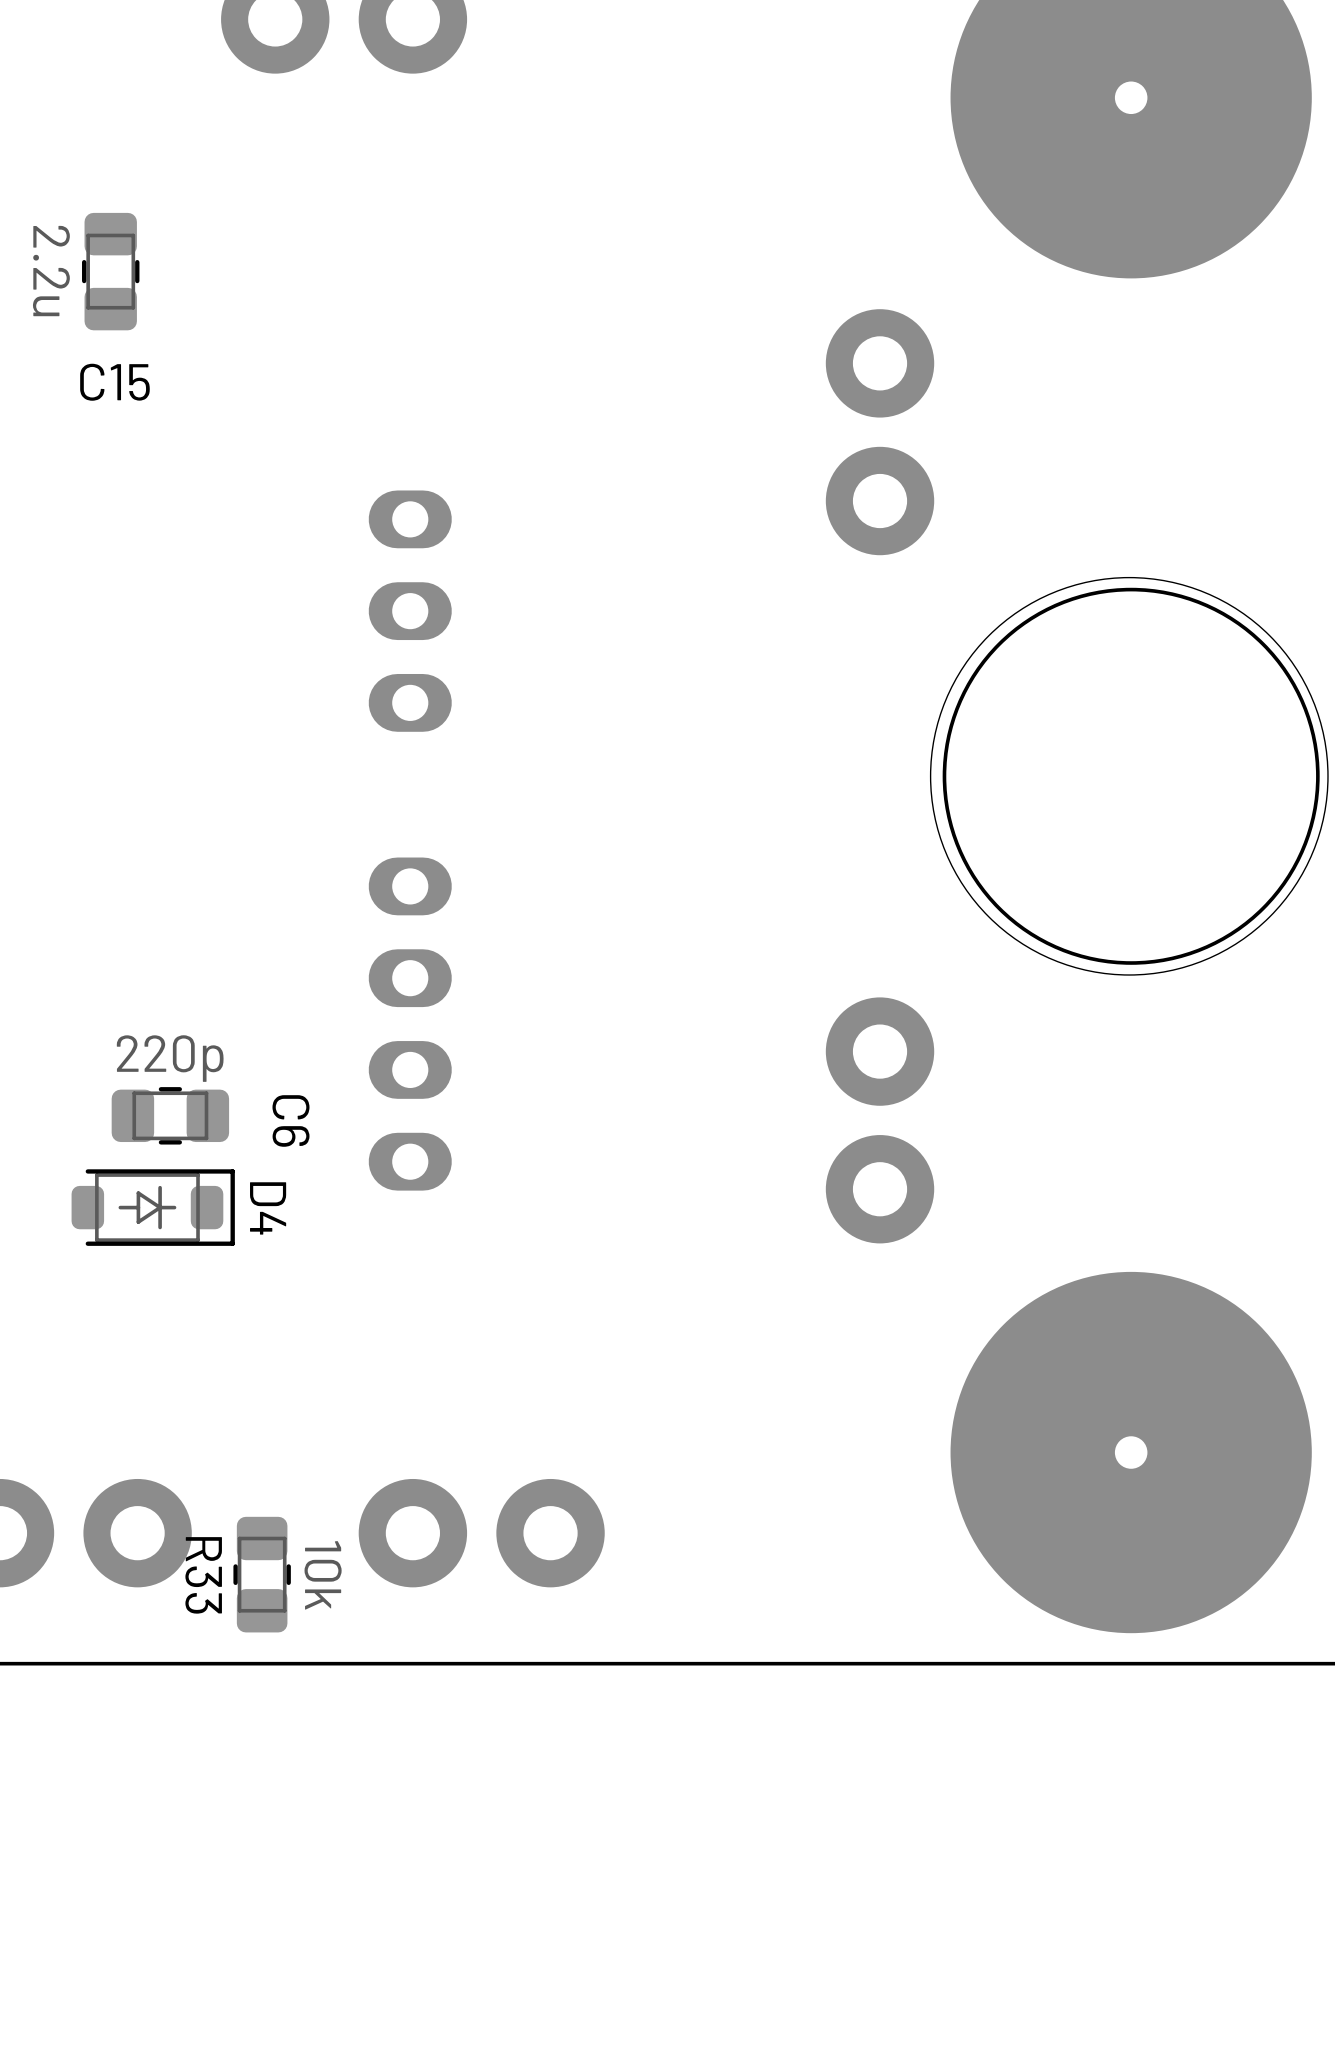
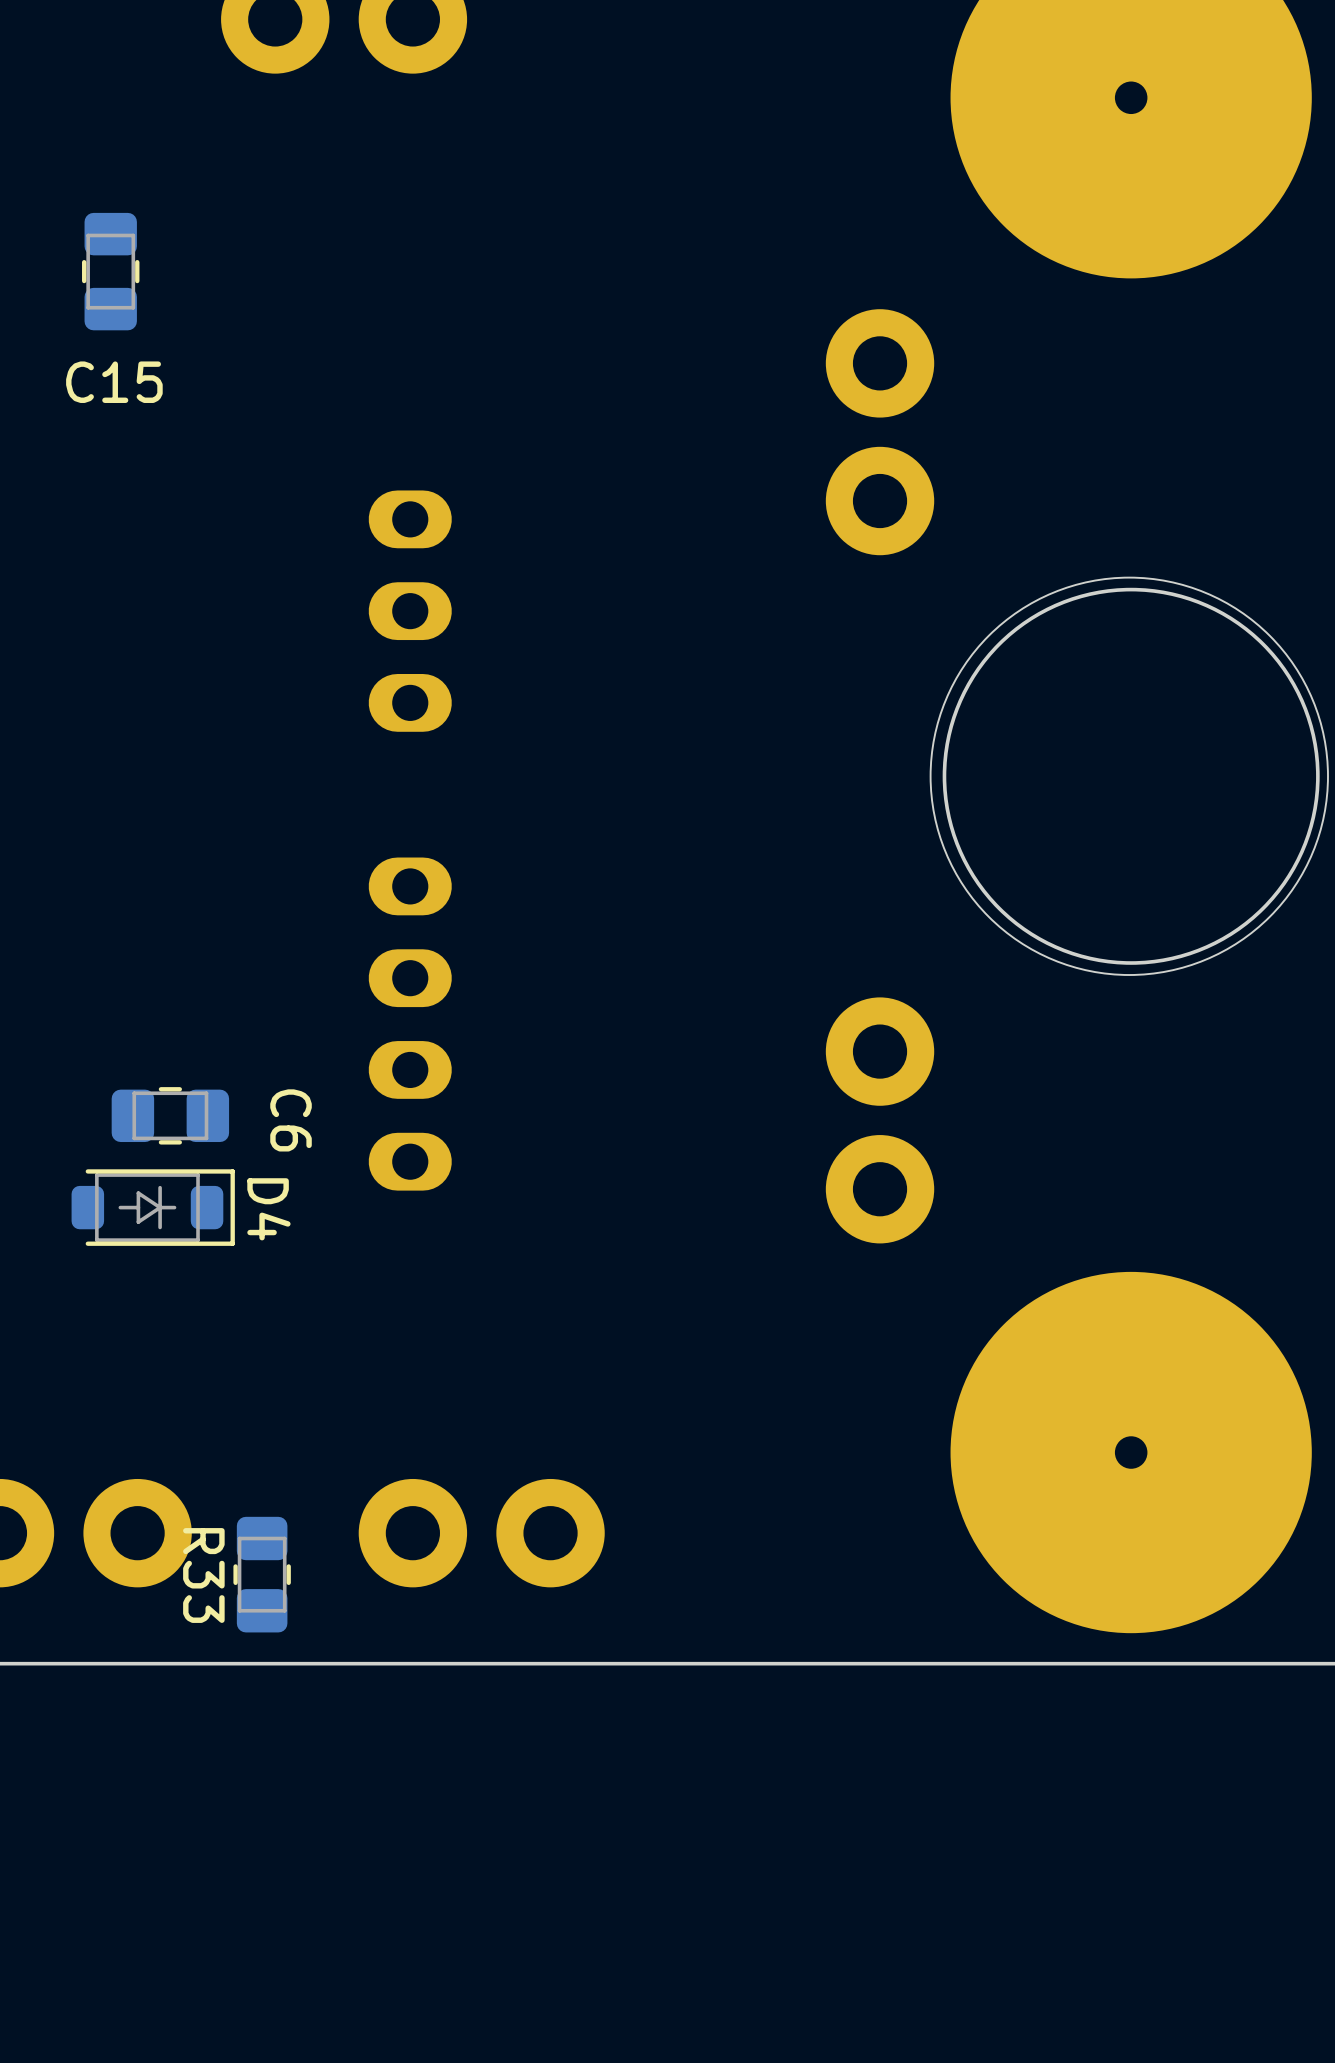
C15 value: 2.2u (51, 271) -> none
C6 value: 220p (170, 1058) -> none
R33 value: 10k (323, 1575) -> none

